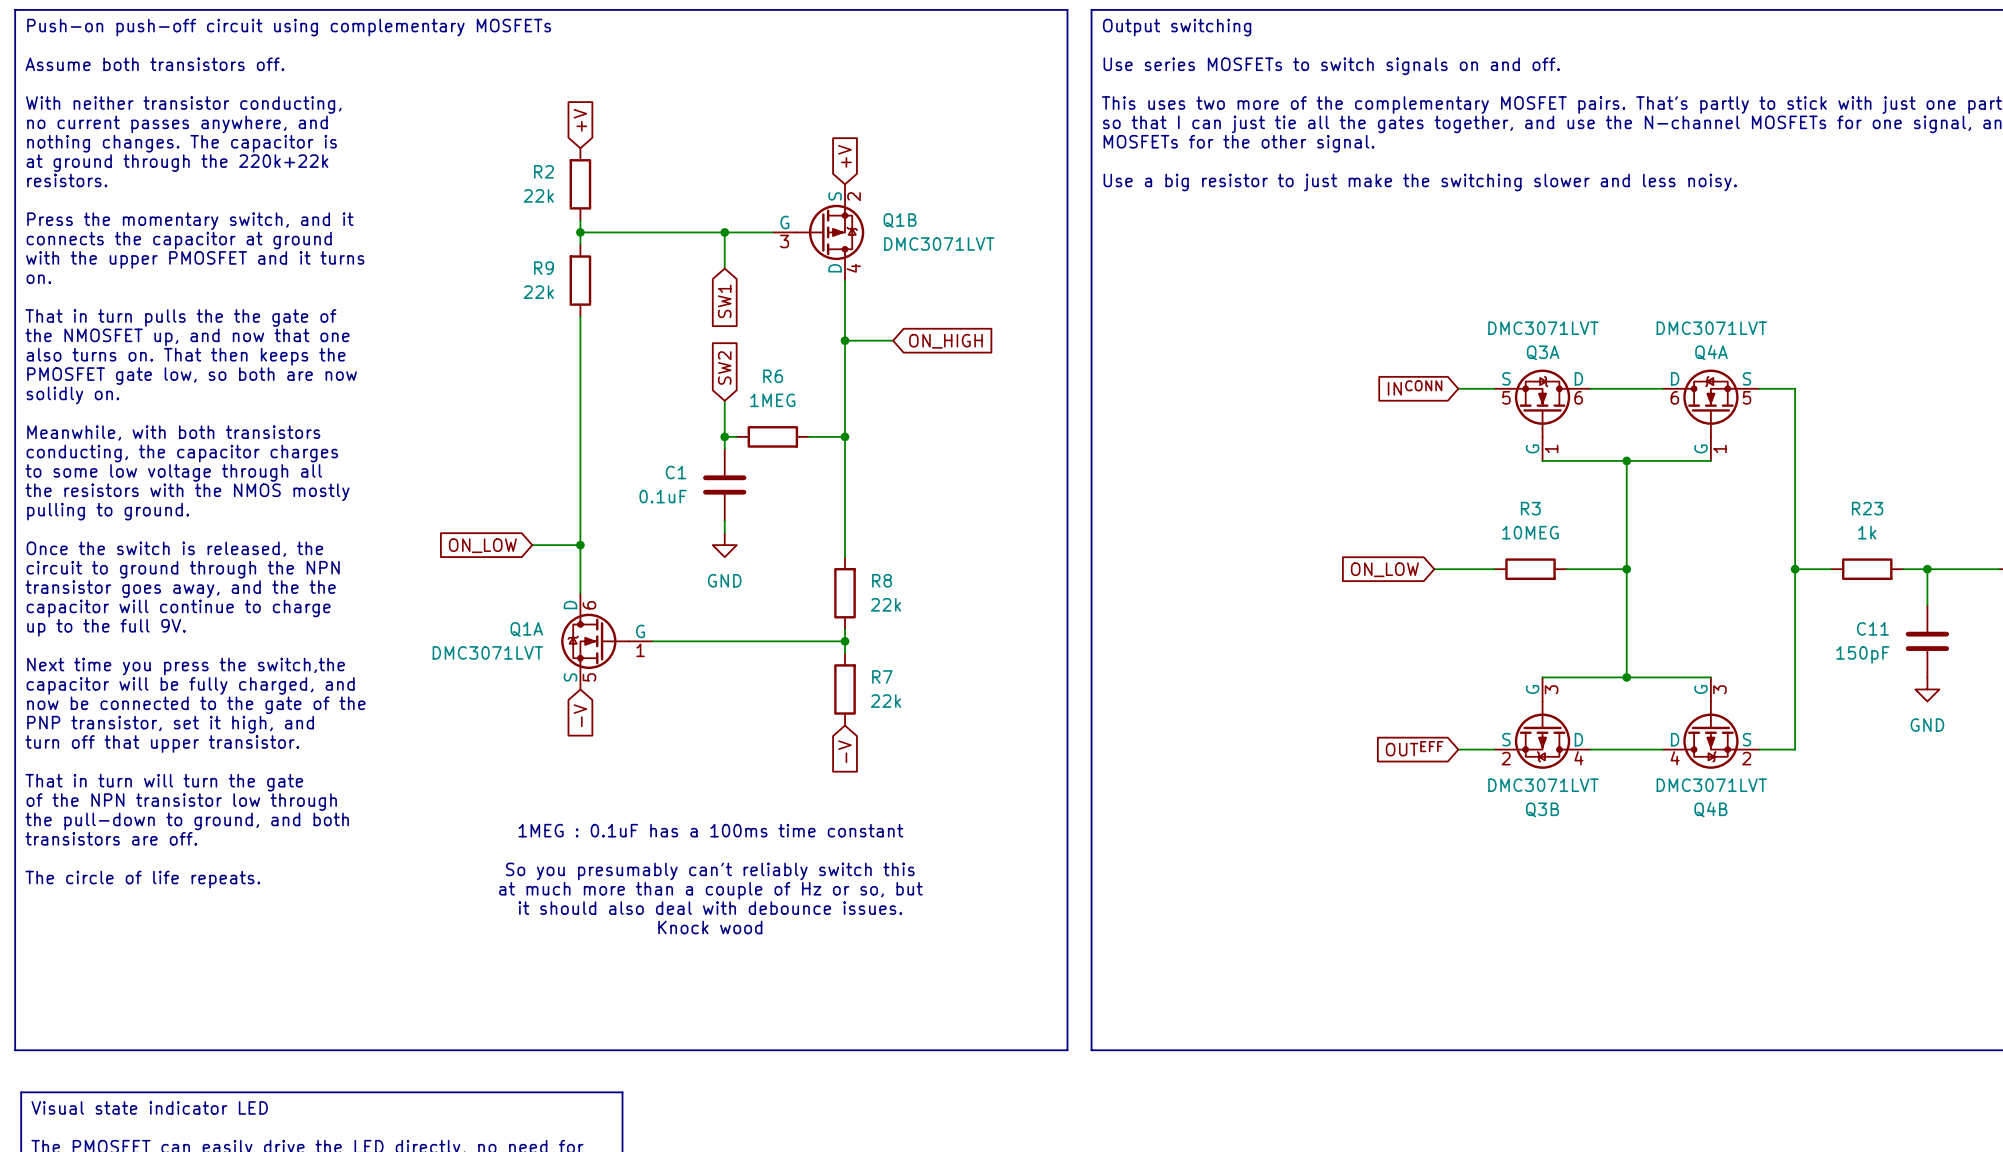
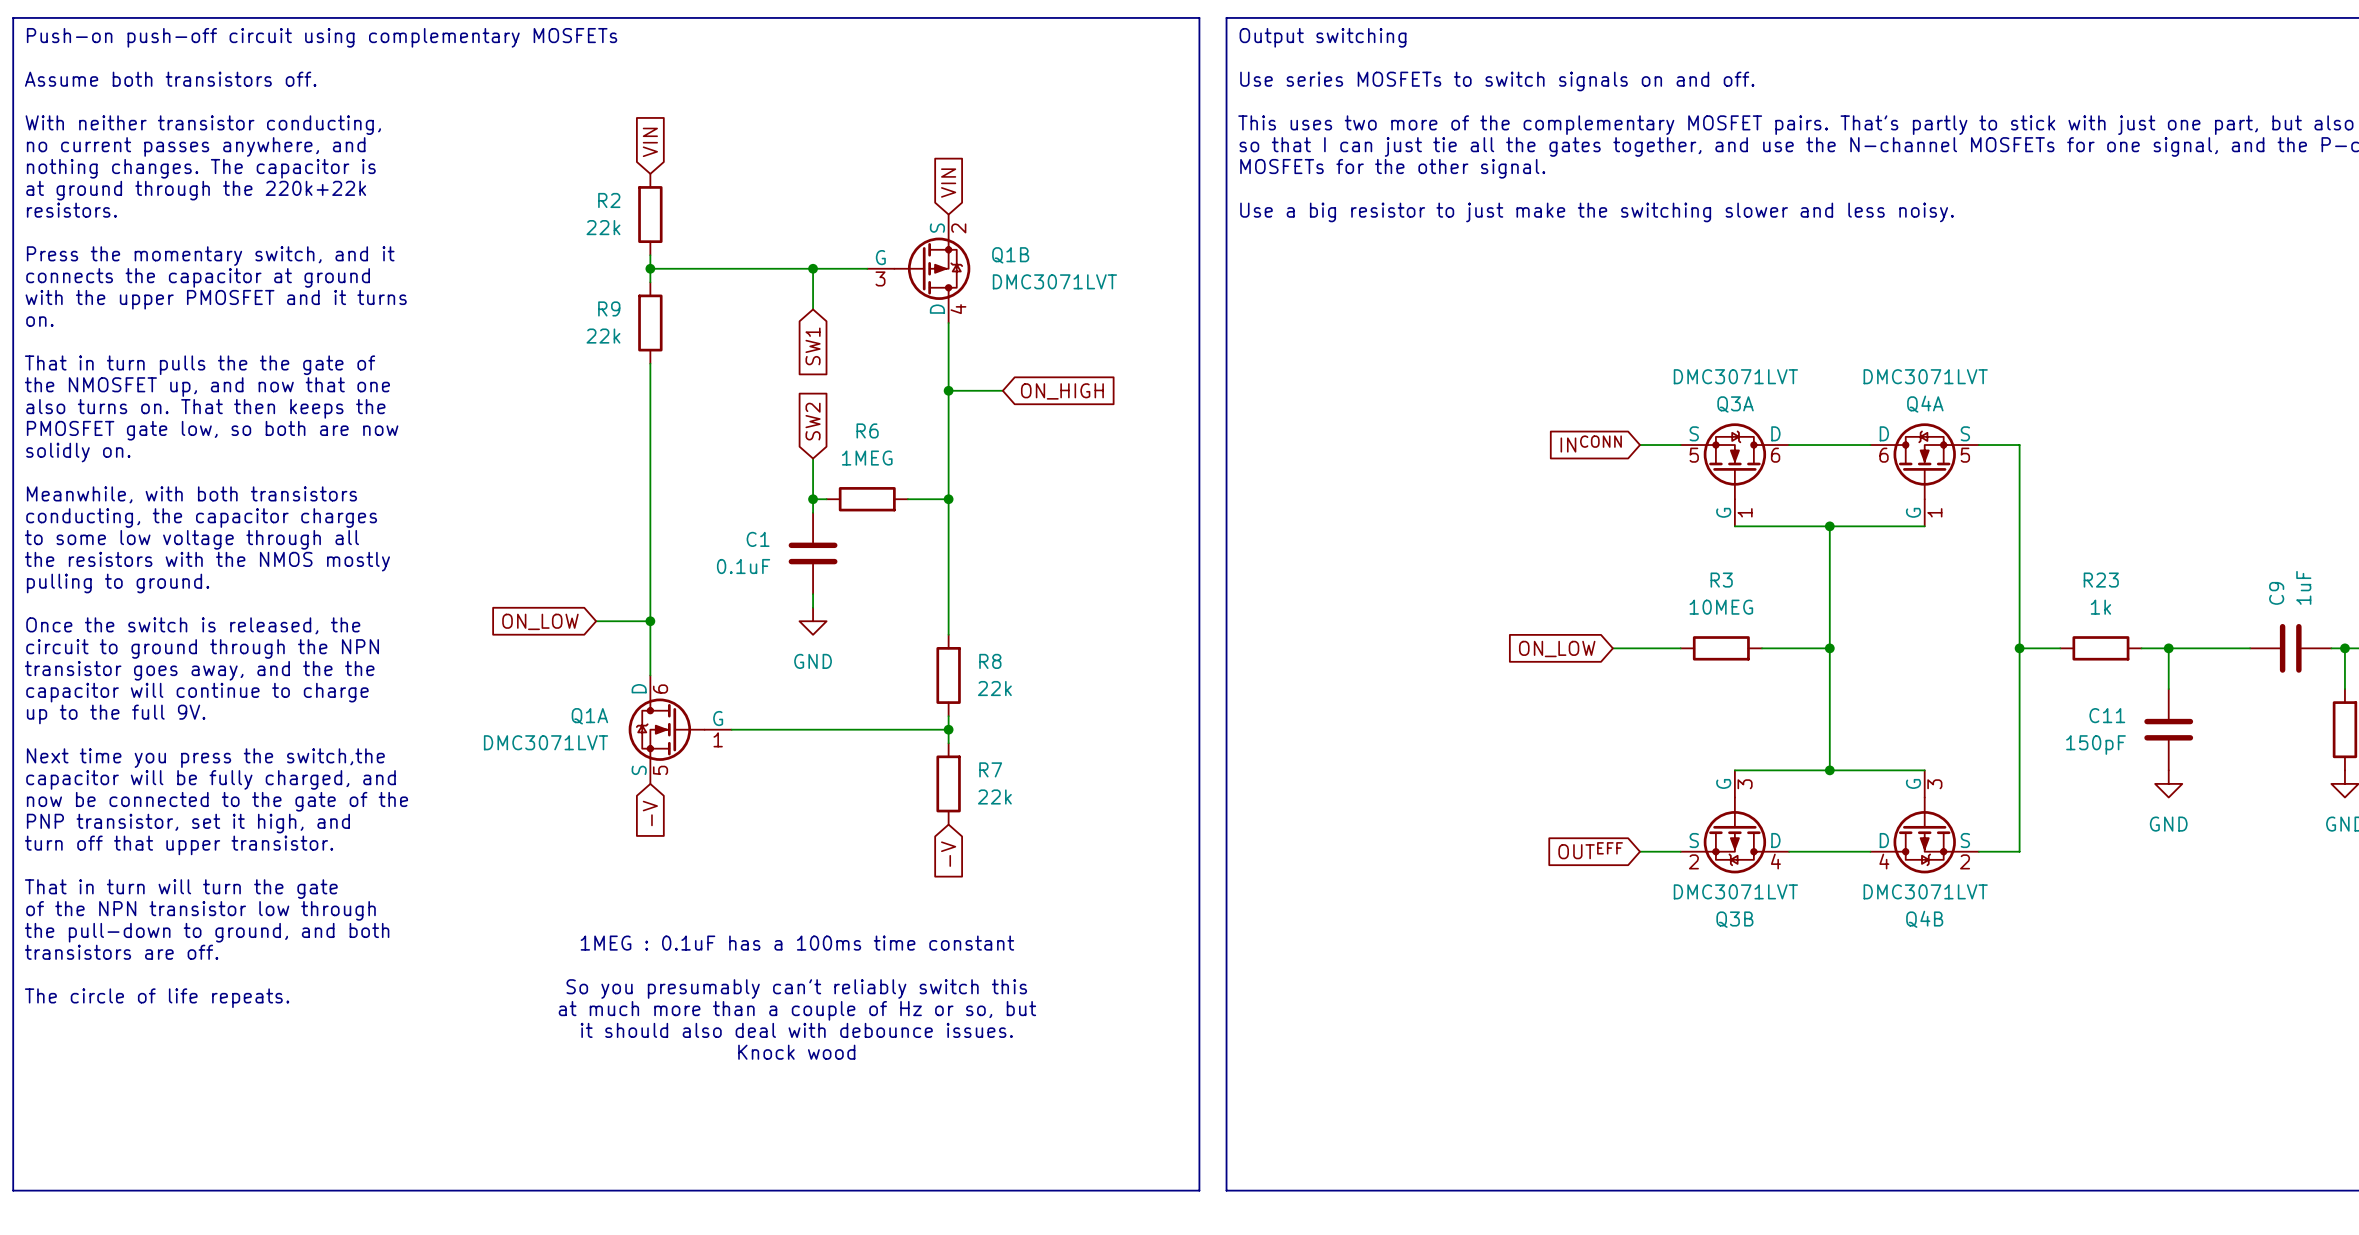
global label: +V (580, 120) -> VIN (650, 142)
global label: +V (845, 156) -> VIN (948, 183)

